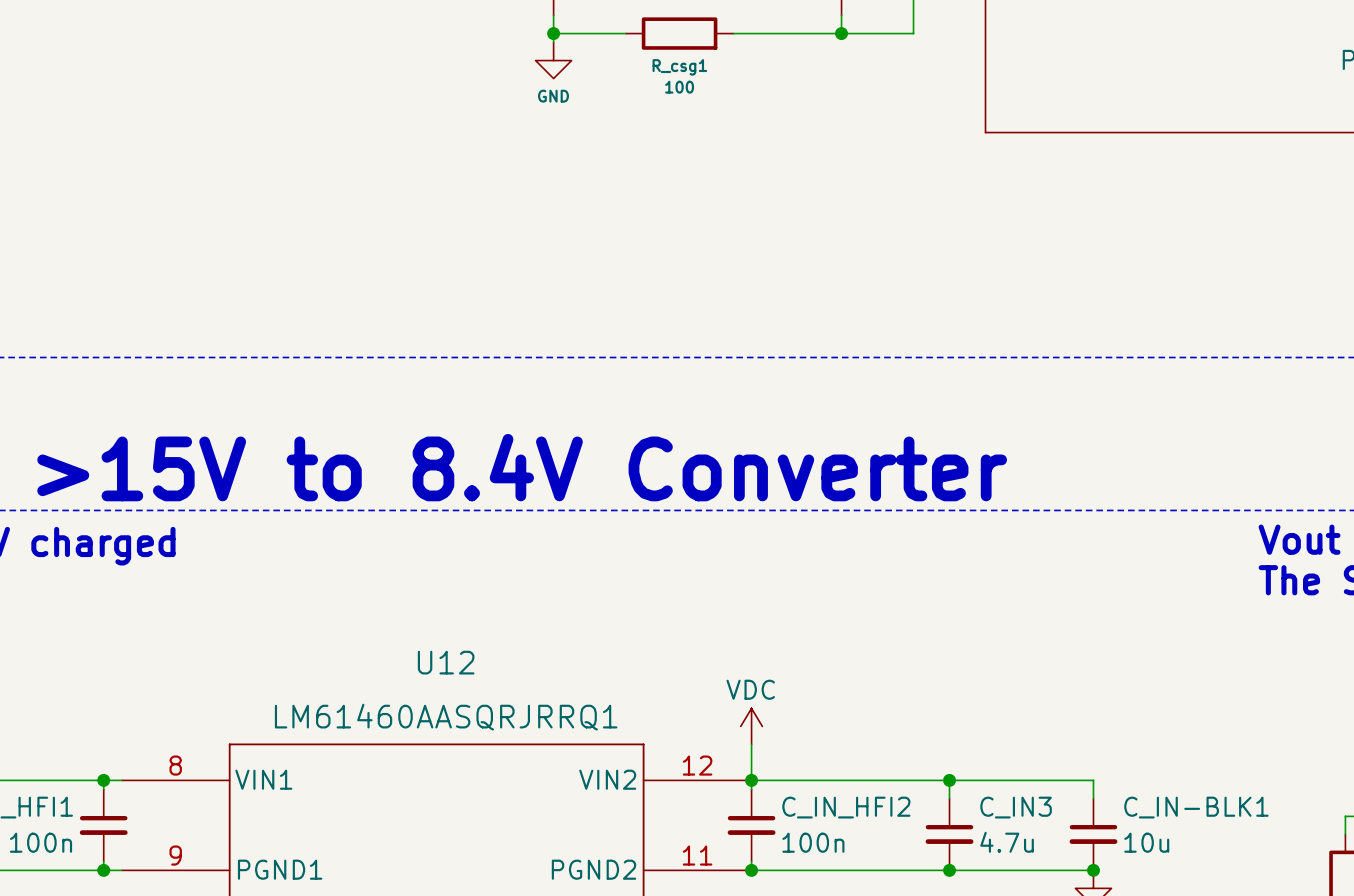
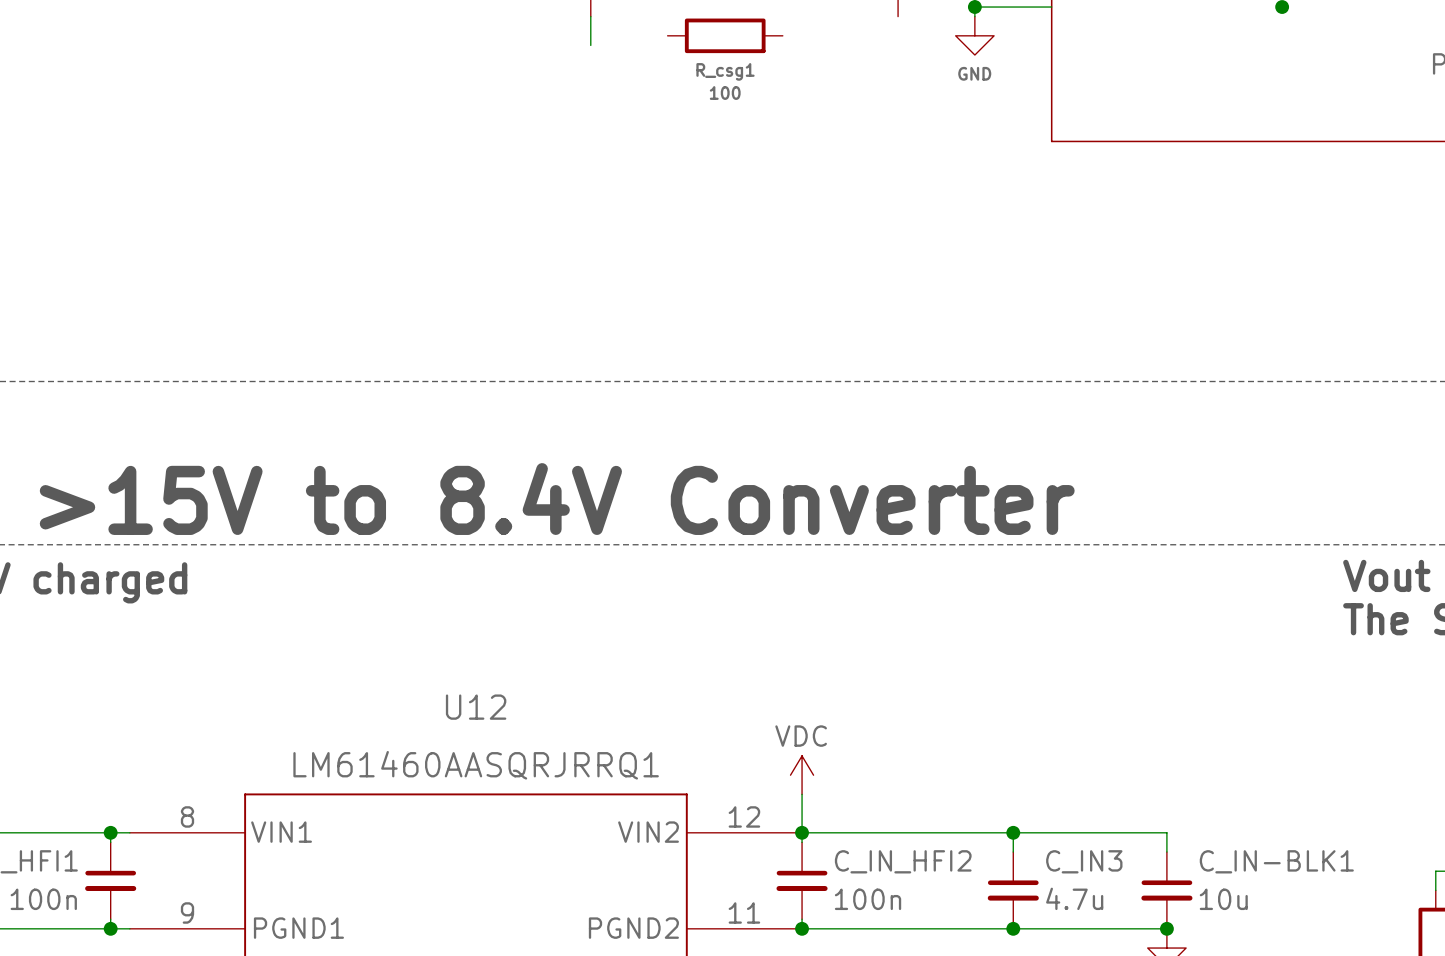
wire: none -> (974, 7) (1051, 7)
junction: none -> (974, 7)
junction: none -> (1282, 7)
wire: (841, 15) (841, 33) -> none
wire: (913, 15) (913, 33) (733, 33) -> none
wire: (553, 33) (625, 33) -> none
junction: (553, 33) -> none
junction: (841, 33) -> none
power symbol: none -> GND (974, 35)
power symbol: GND (553, 60) -> none

